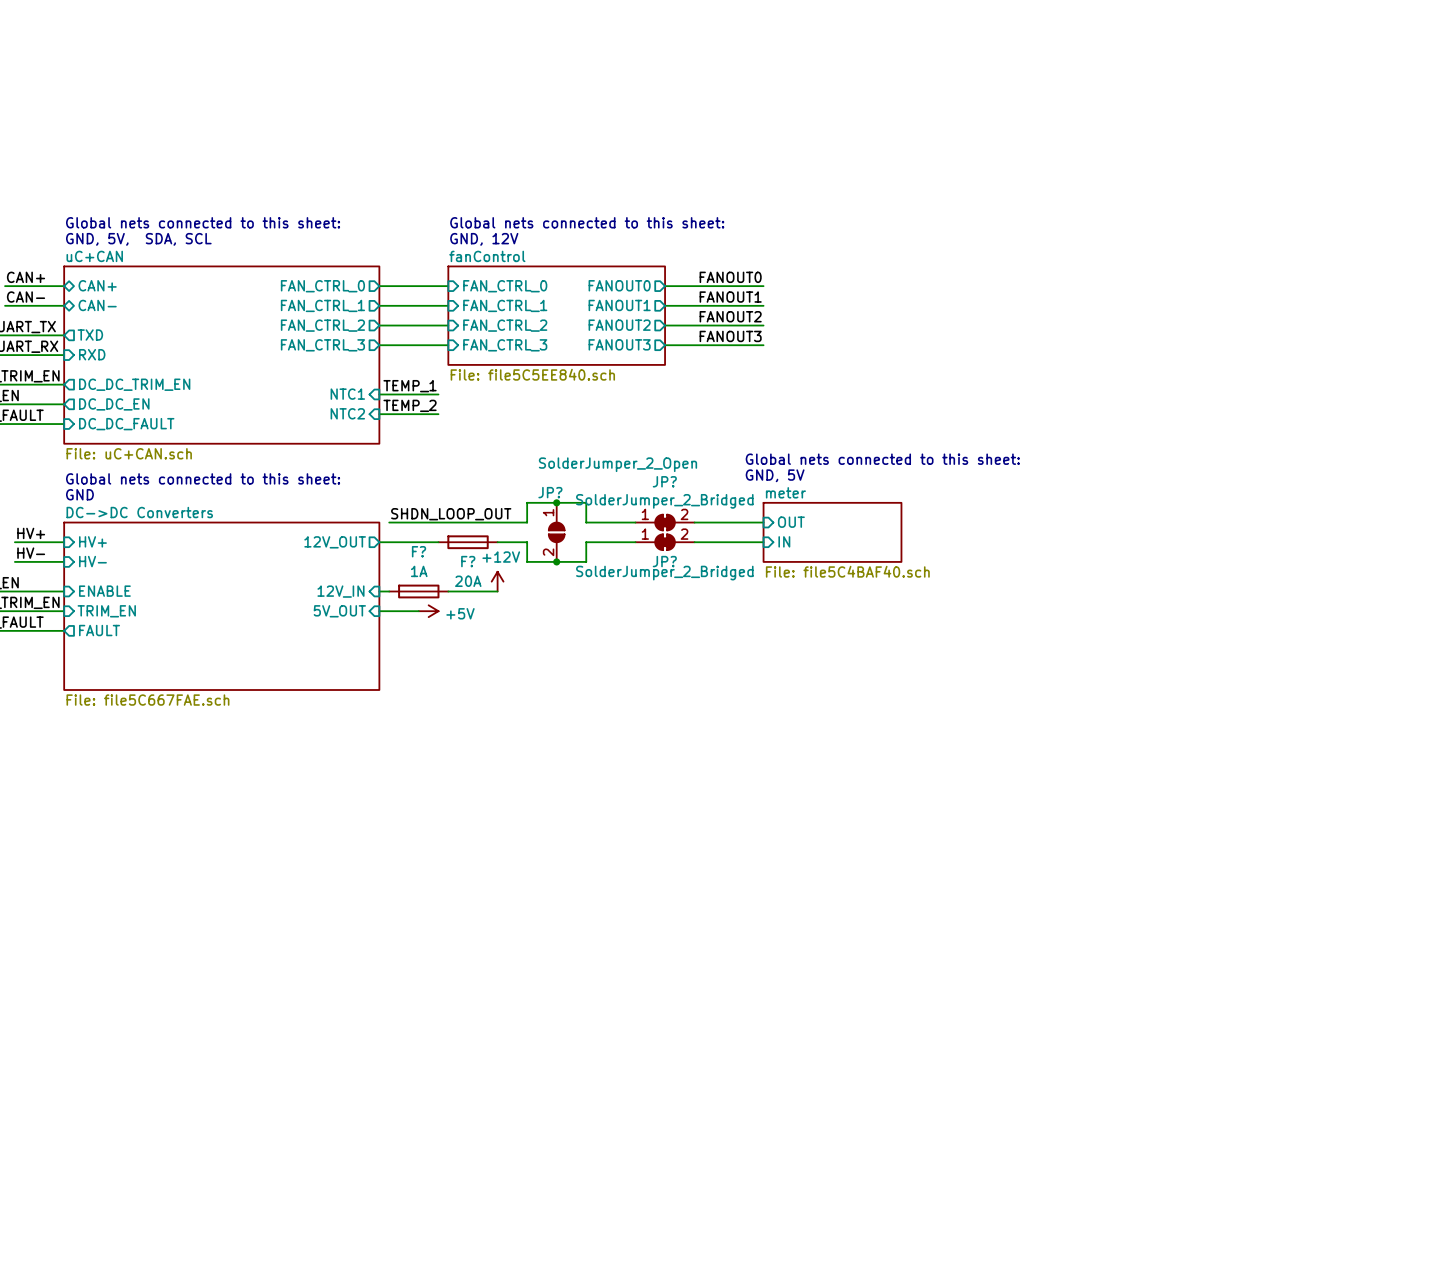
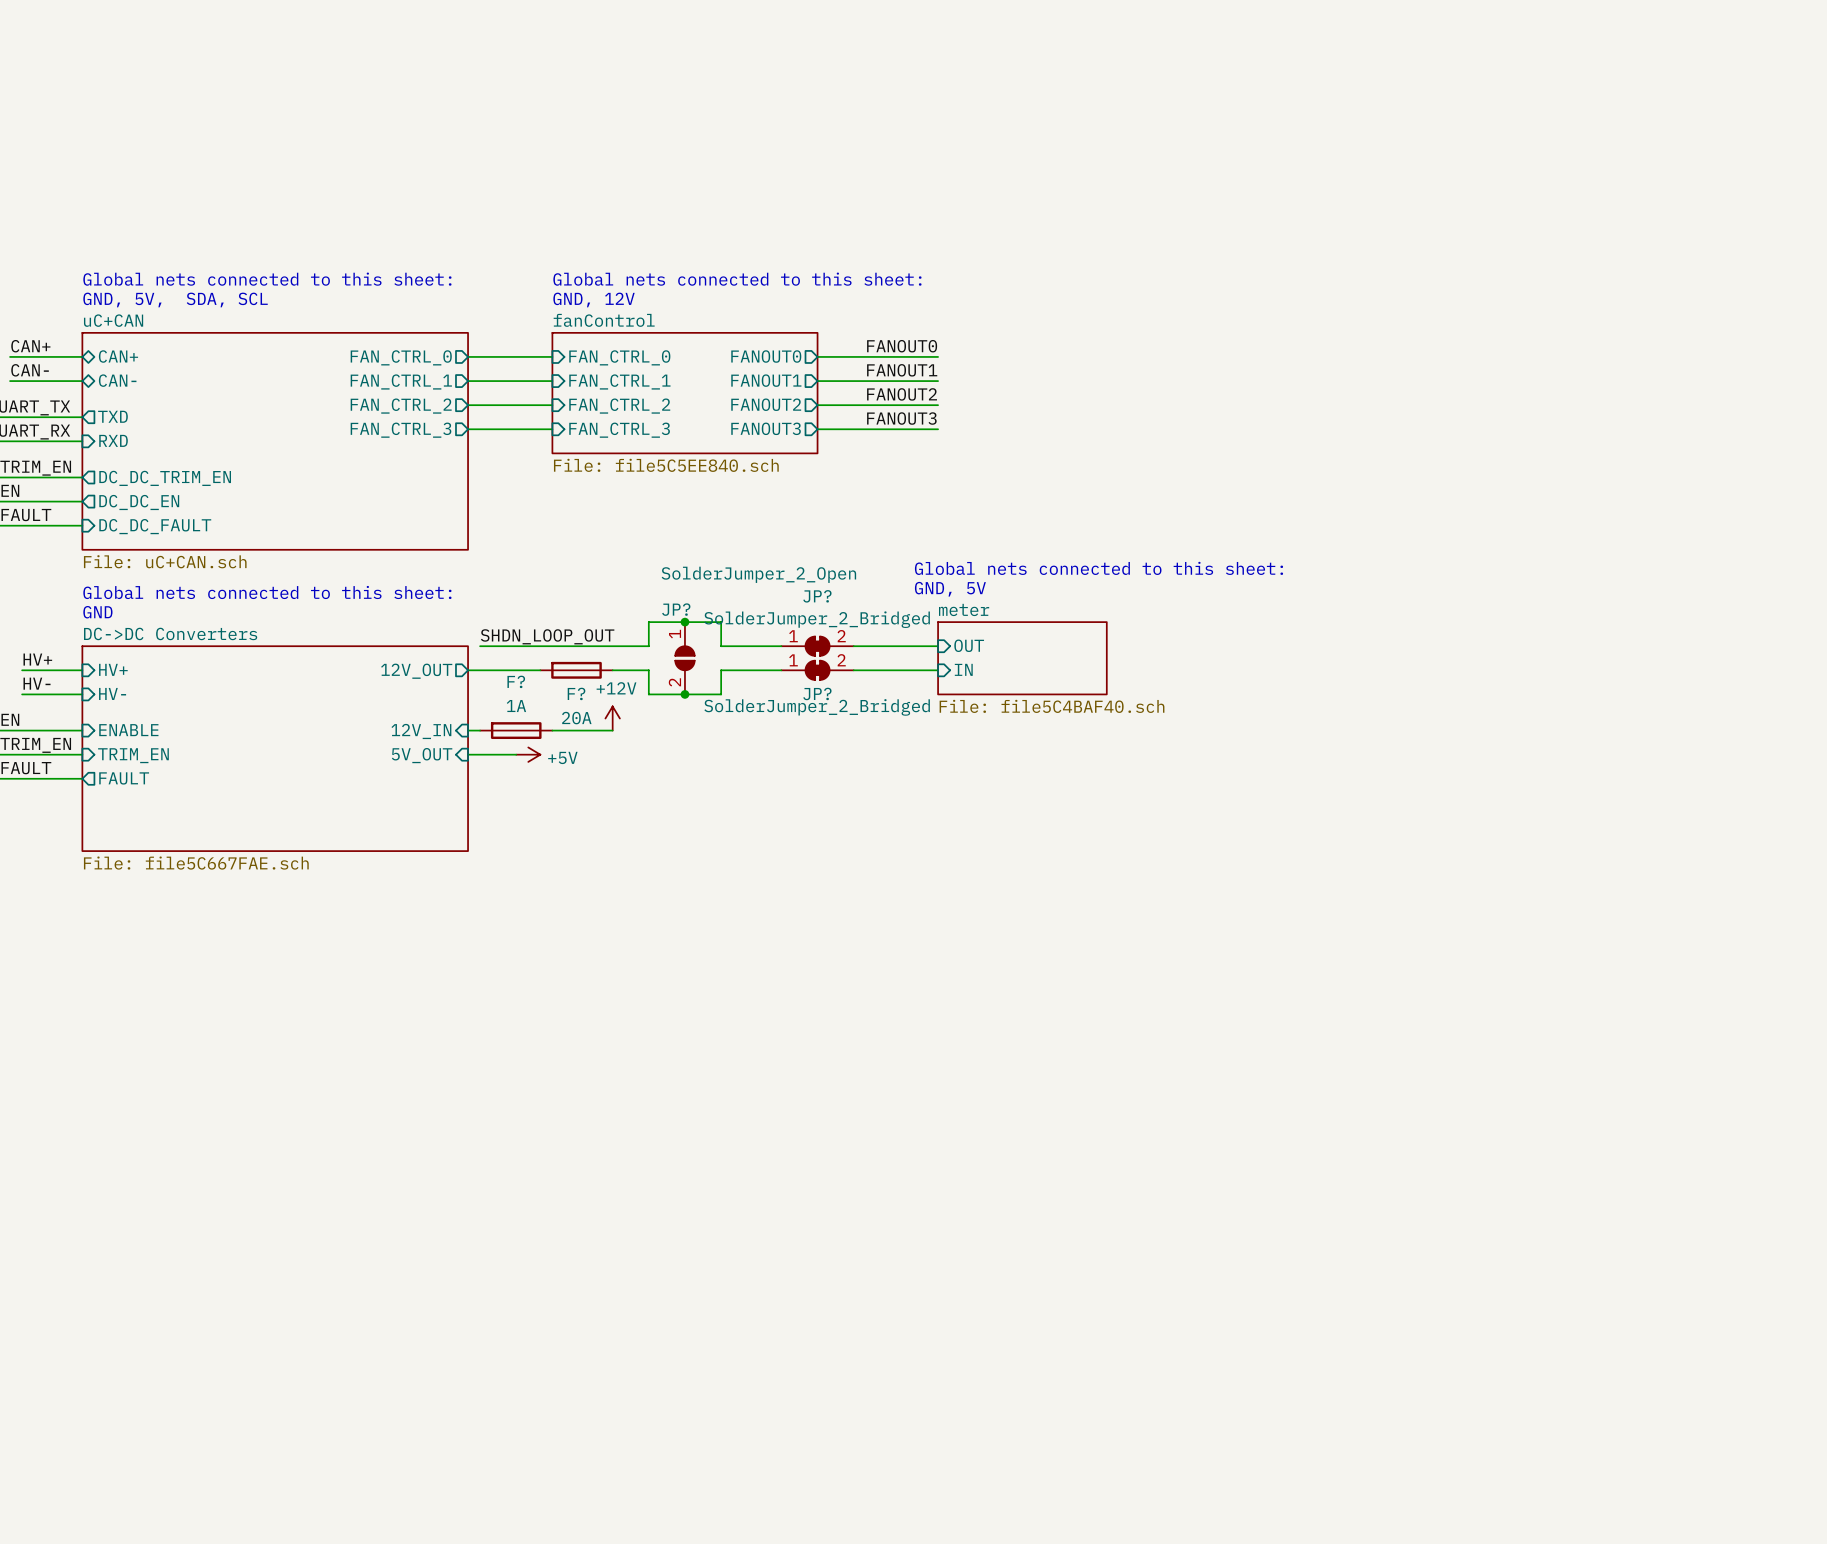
label: TEMP_1 (410, 386) -> none
sheet pin: NTC1 (347, 394) -> none
wire: (379, 394) (438, 394) -> none
label: TEMP_2 (410, 405) -> none
sheet pin: NTC2 (347, 413) -> none
wire: (379, 414) (438, 414) -> none

